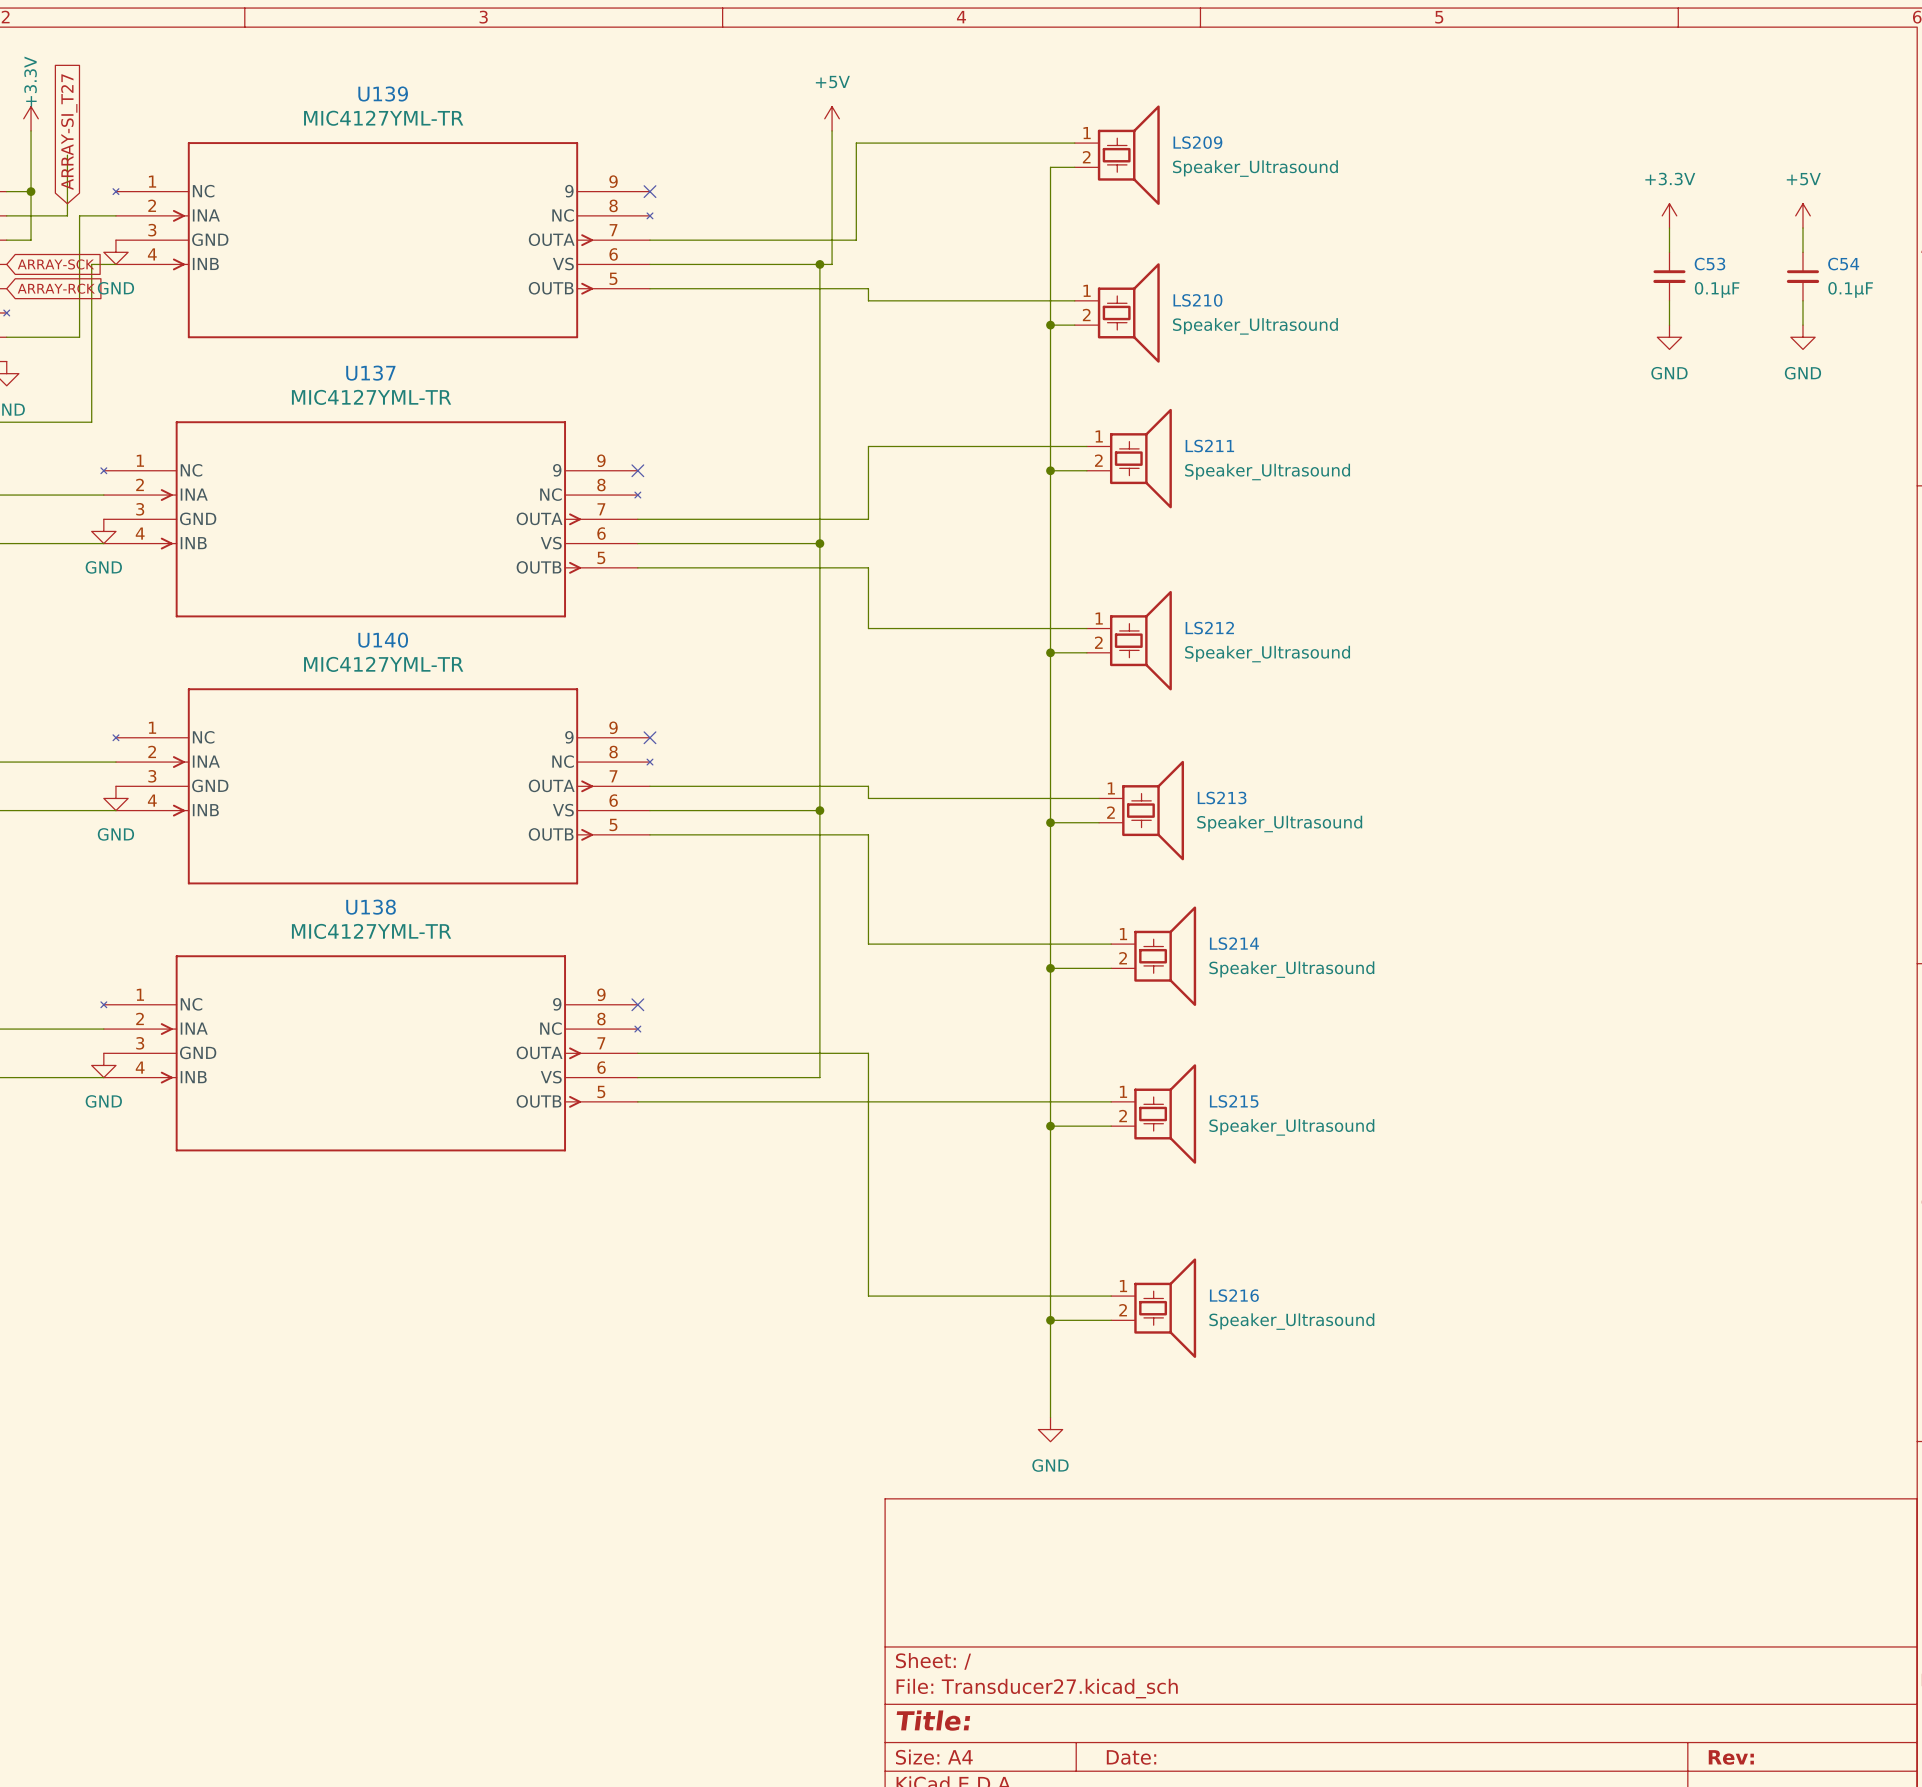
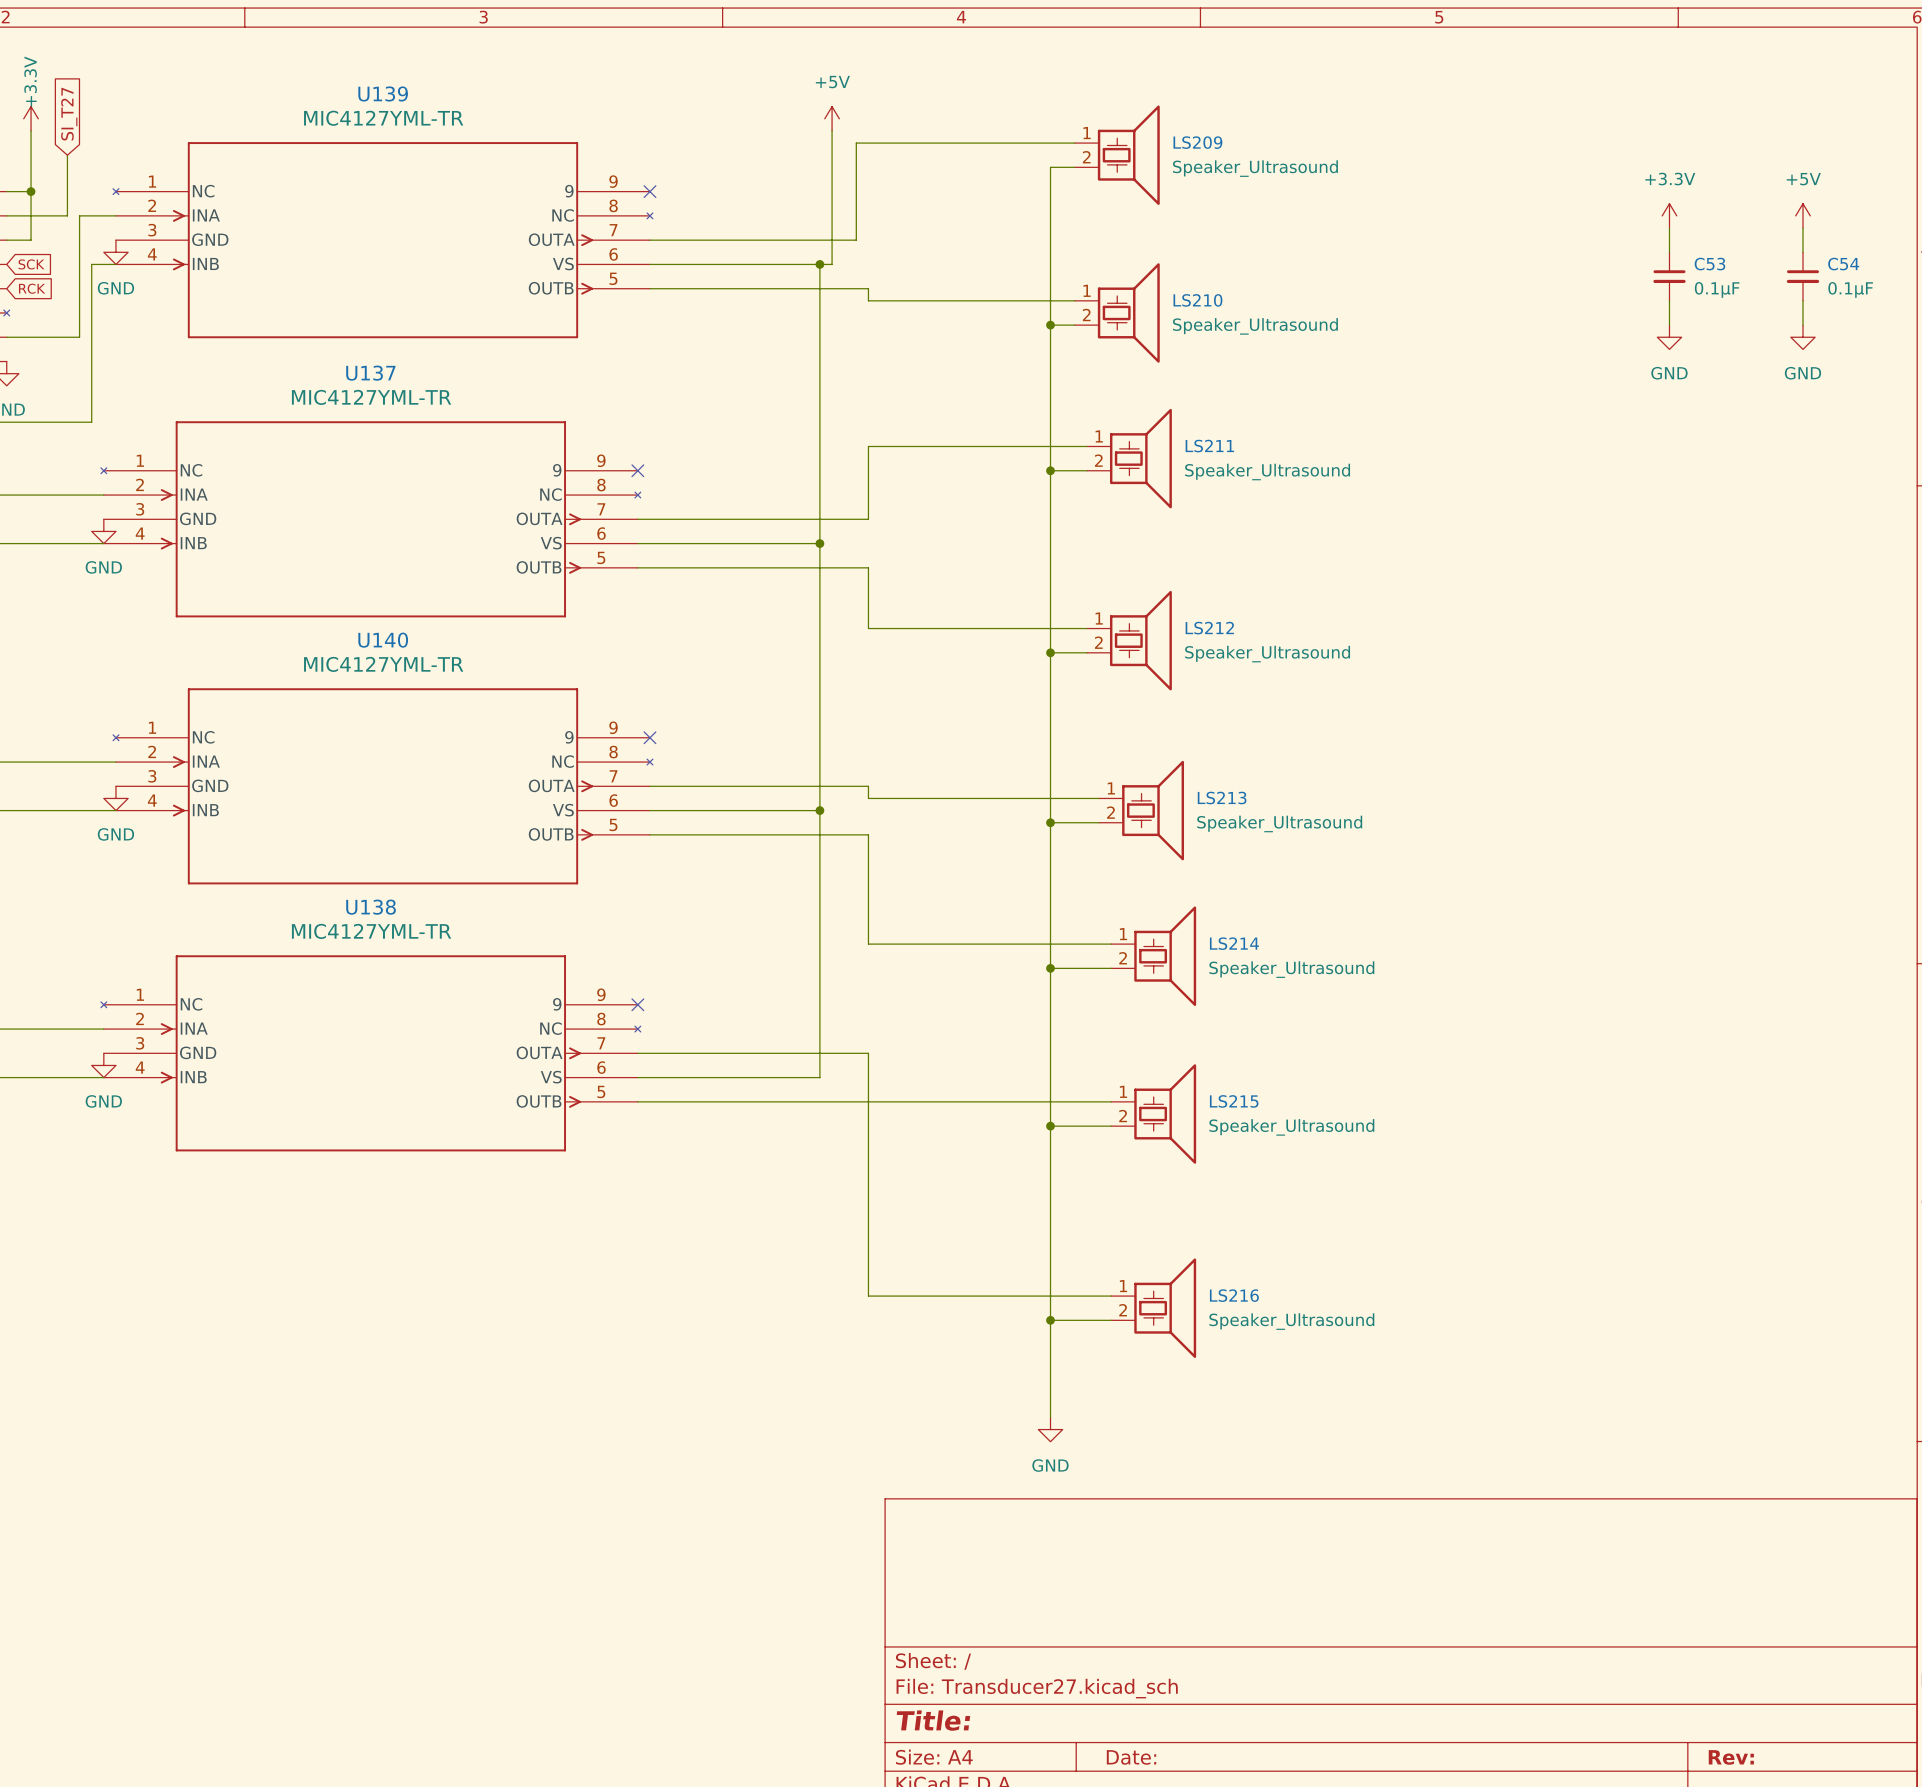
global label: ARRAY-SI_T27 (69, 132) -> SI_T27 (69, 114)
global label: ARRAY-SCK (55, 264) -> SCK (31, 264)
global label: ARRAY-RCK (56, 288) -> RCK (32, 288)

